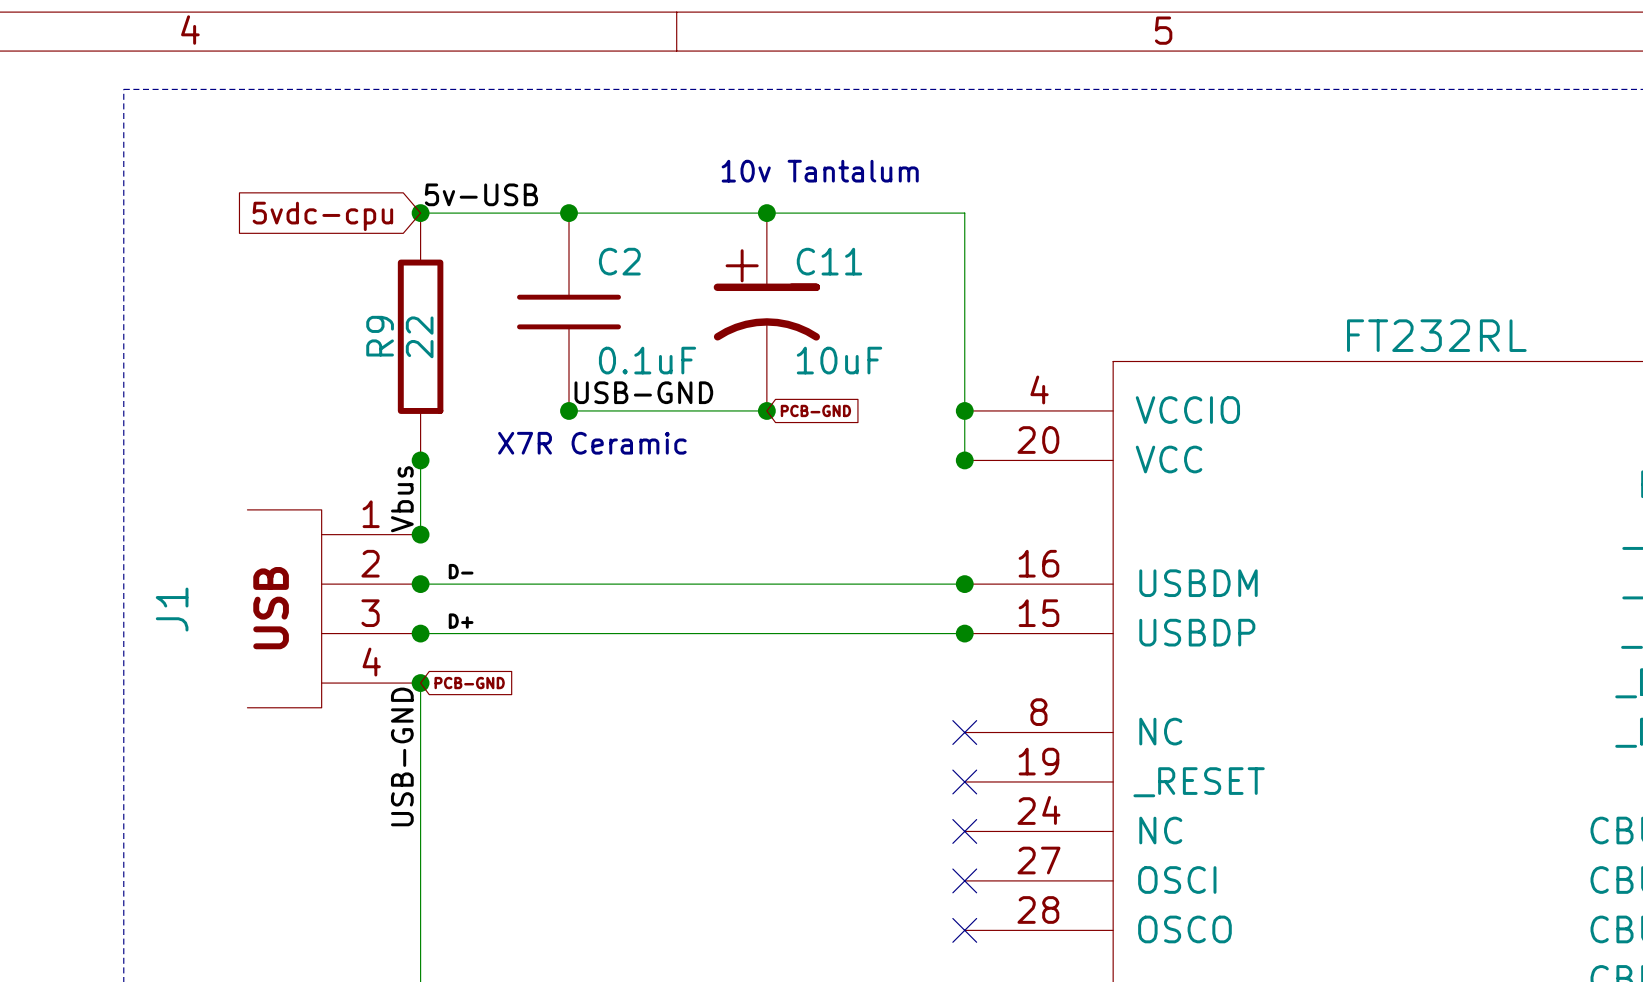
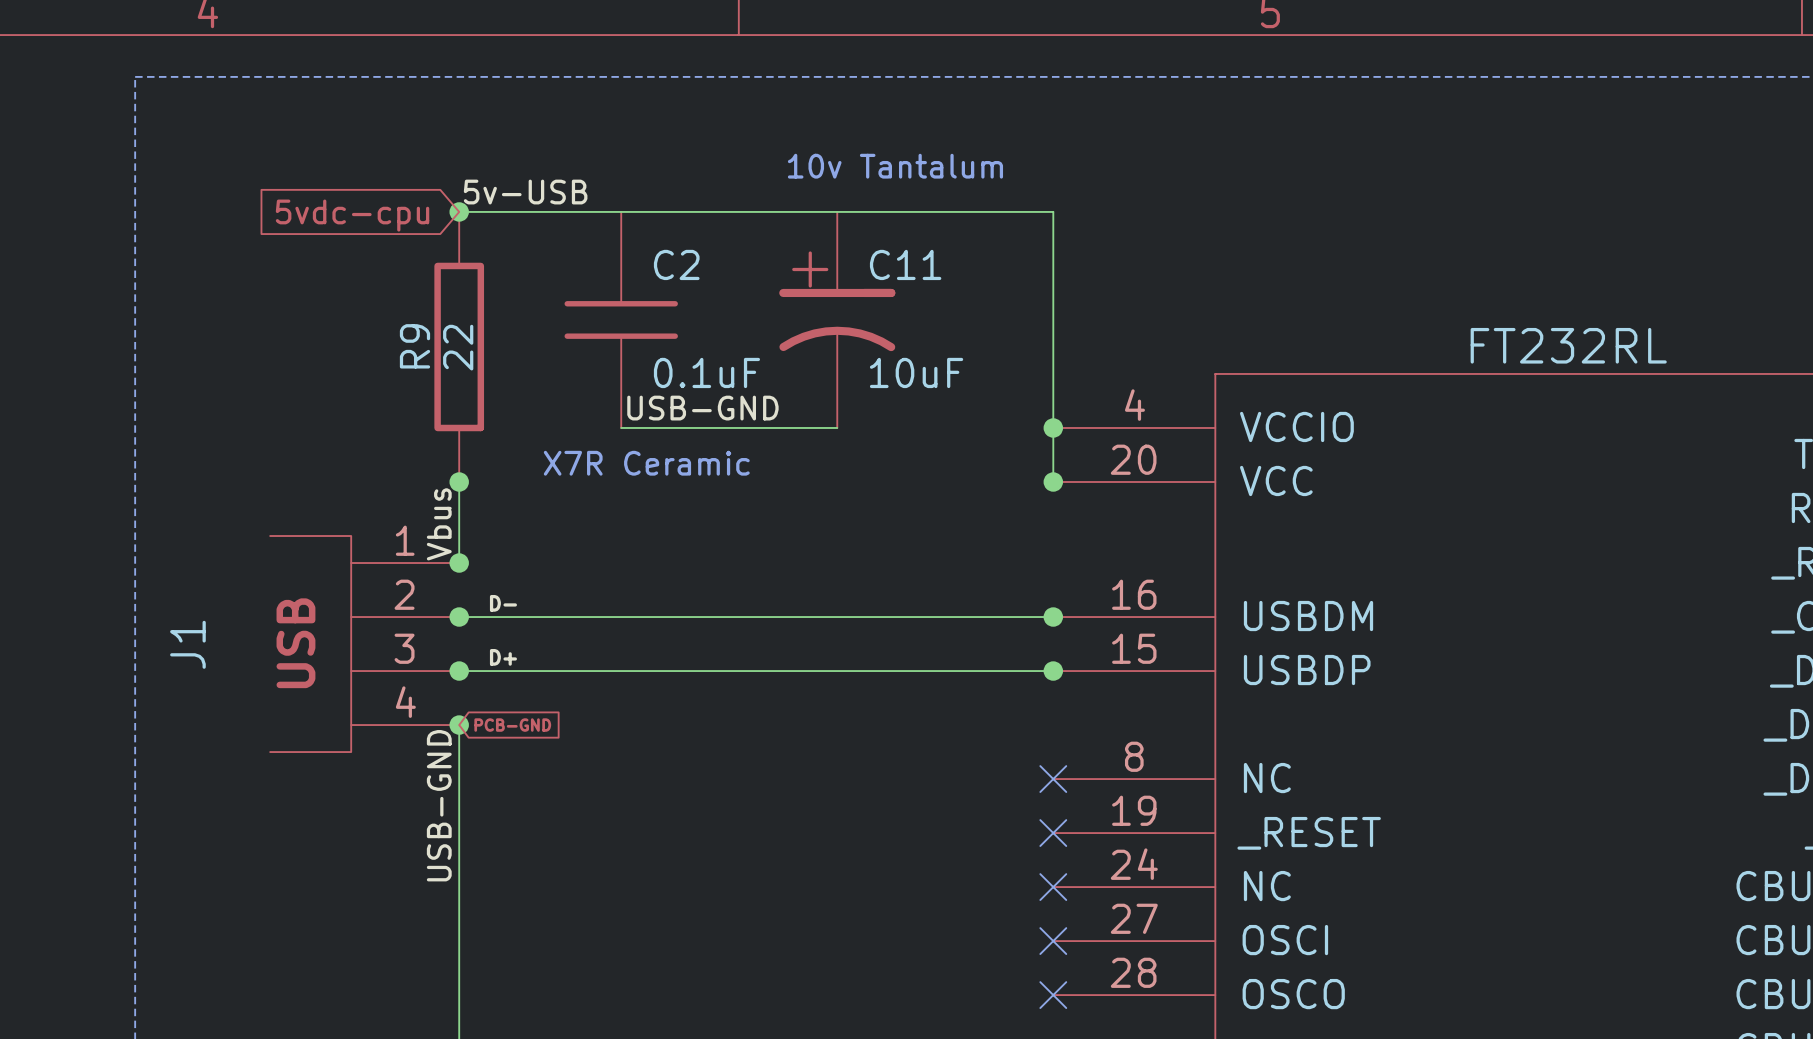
junction: (569, 213) -> none
junction: (766, 213) -> none
junction: (569, 410) -> none
junction: (766, 410) -> none
global label: PCB-GND (815, 410) -> none

